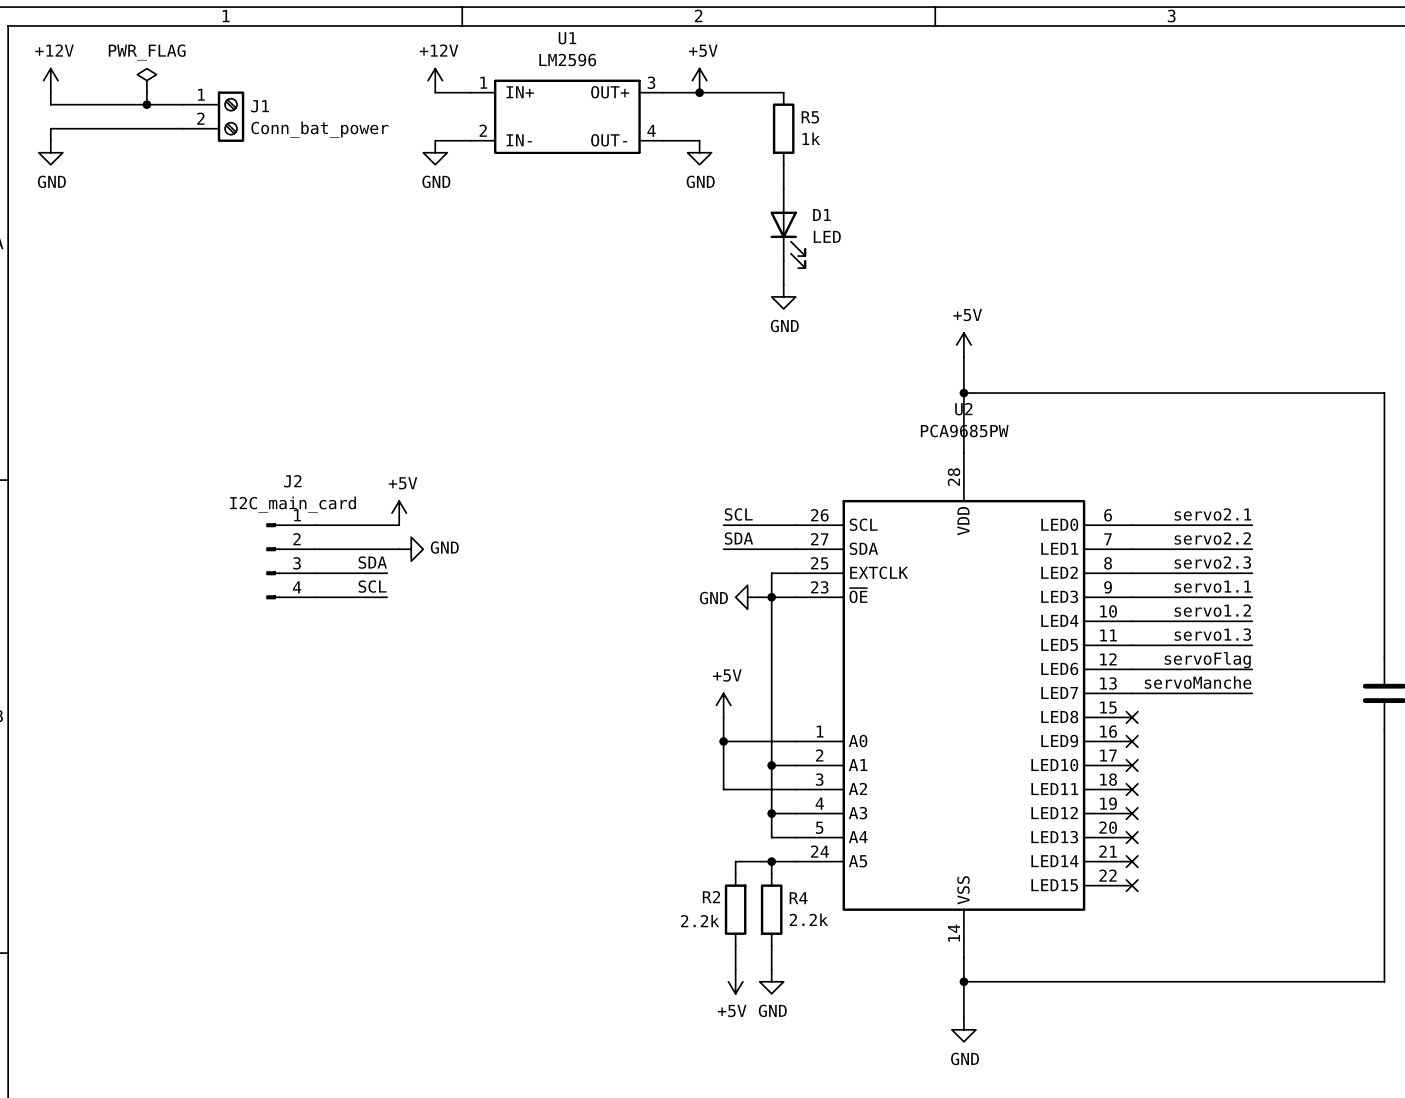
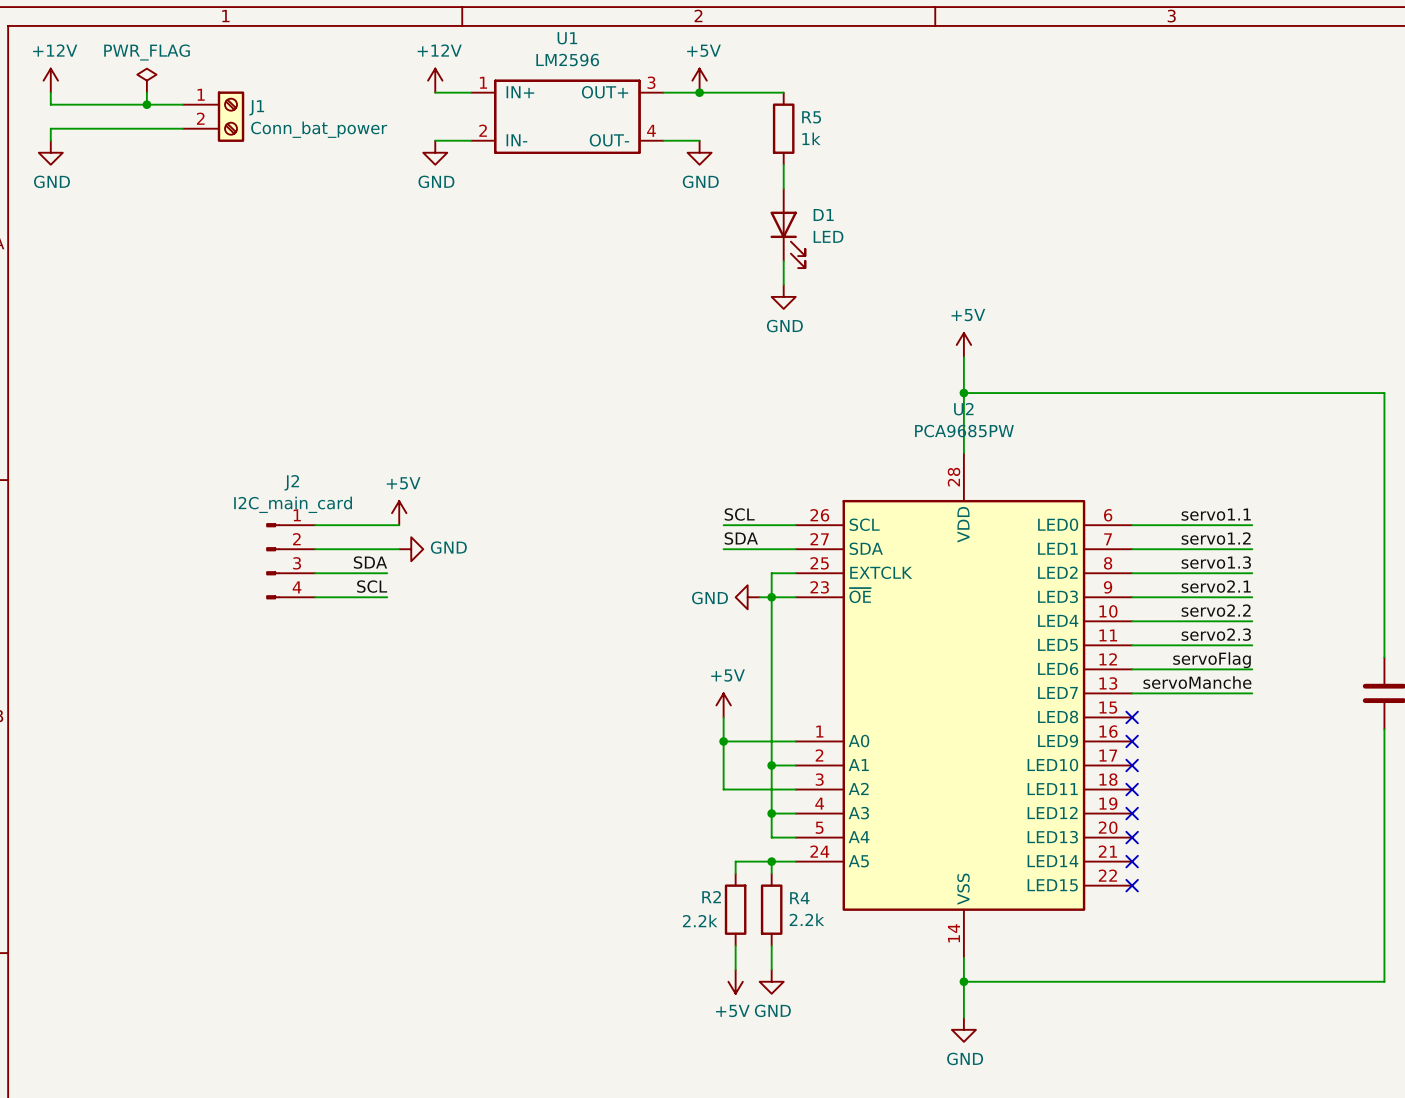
label: servo2.1 (1212, 514) -> servo1.1 (1216, 514)
label: servo2.2 (1212, 538) -> servo1.2 (1216, 538)
label: servo2.3 (1212, 562) -> servo1.3 (1216, 562)
label: servo1.1 (1212, 586) -> servo2.1 (1216, 586)
label: servo1.2 (1212, 610) -> servo2.2 (1216, 610)
label: servo1.3 (1212, 634) -> servo2.3 (1216, 634)

